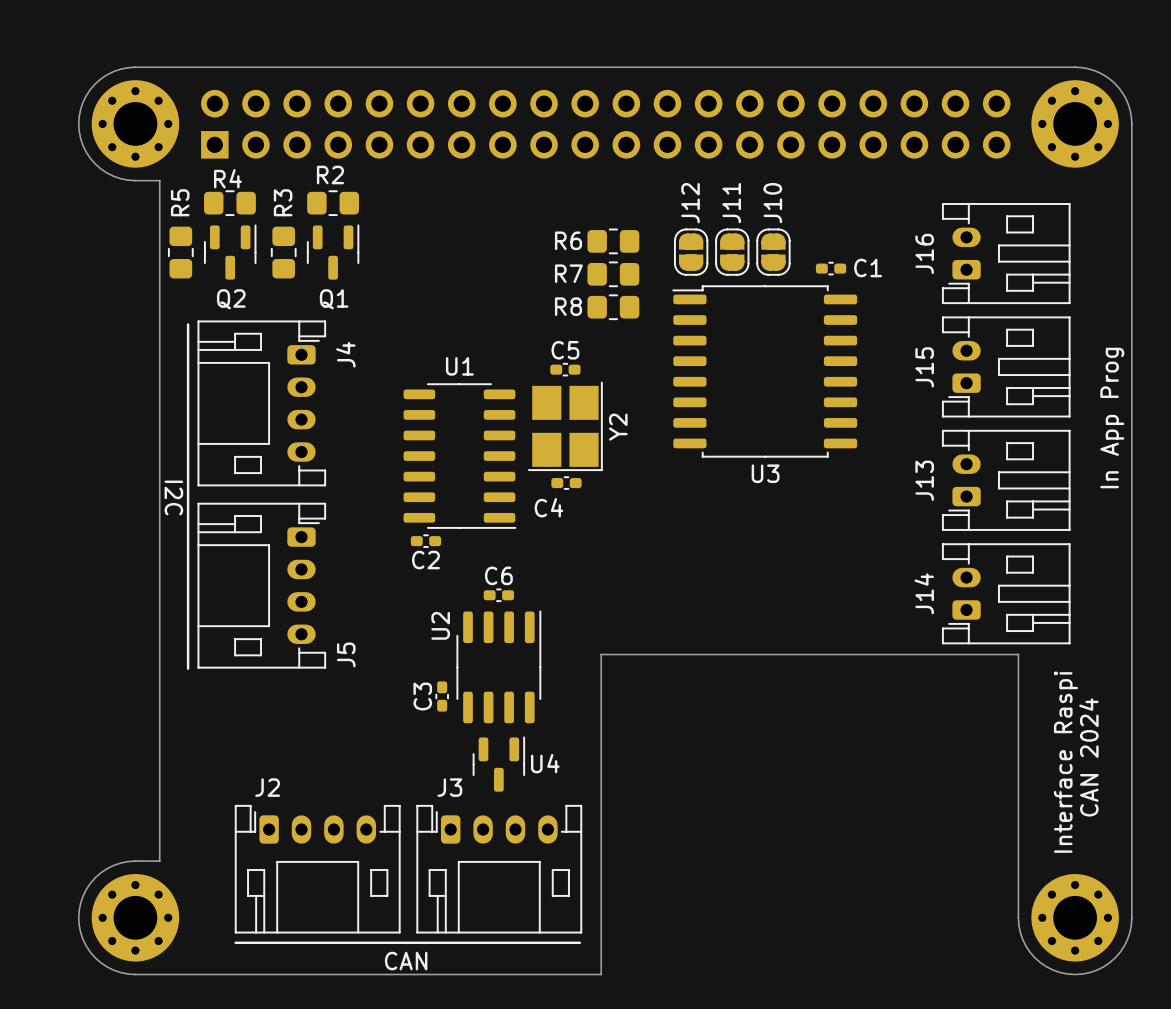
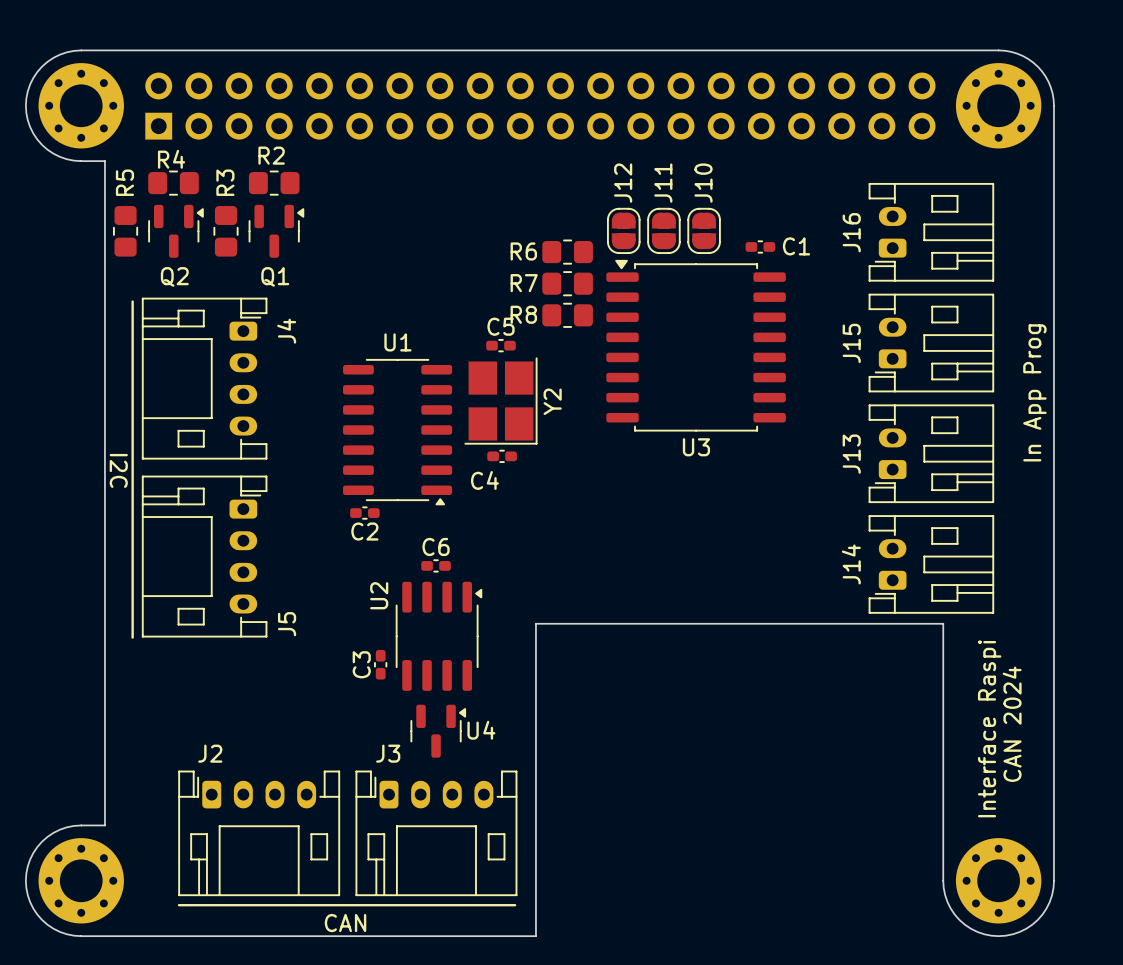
Q2 footprint: [203, 224, 257, 280] -> [148, 204, 204, 258]
Q1 footprint: [306, 224, 360, 280] -> [248, 204, 305, 258]
R6 position: (613, 241) -> (567, 252)
R7 position: (613, 274) -> (567, 283)
U3 footprint: [672, 285, 858, 458] -> [606, 259, 786, 432]
R8 position: (613, 307) -> (567, 315)
U1 footprint: [403, 383, 517, 529] -> [343, 358, 453, 506]
U2 footprint: [456, 610, 542, 724] -> [395, 581, 483, 691]
U4 footprint: [472, 736, 526, 792] -> [410, 704, 467, 758]

